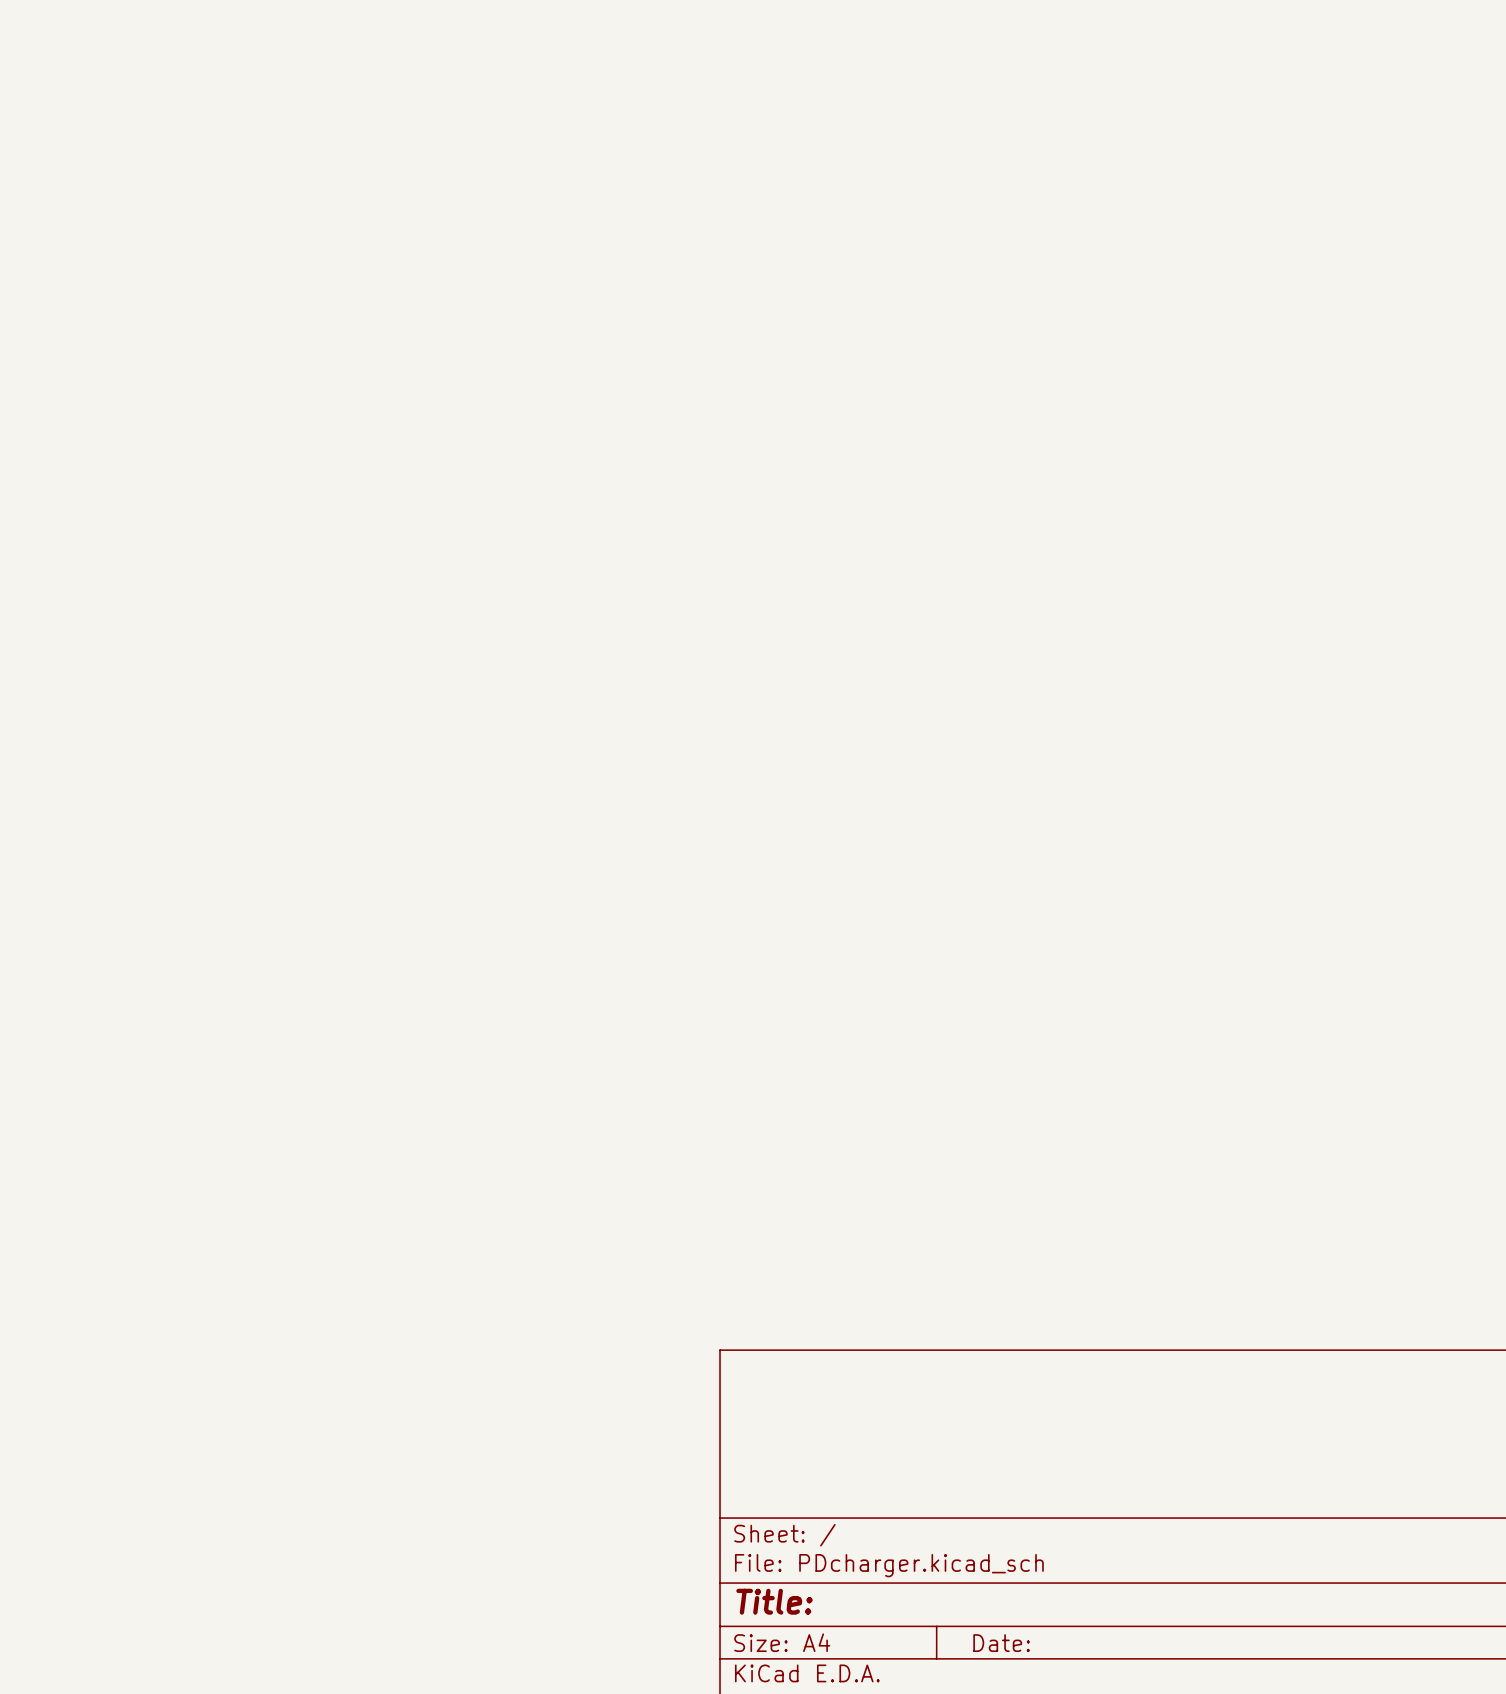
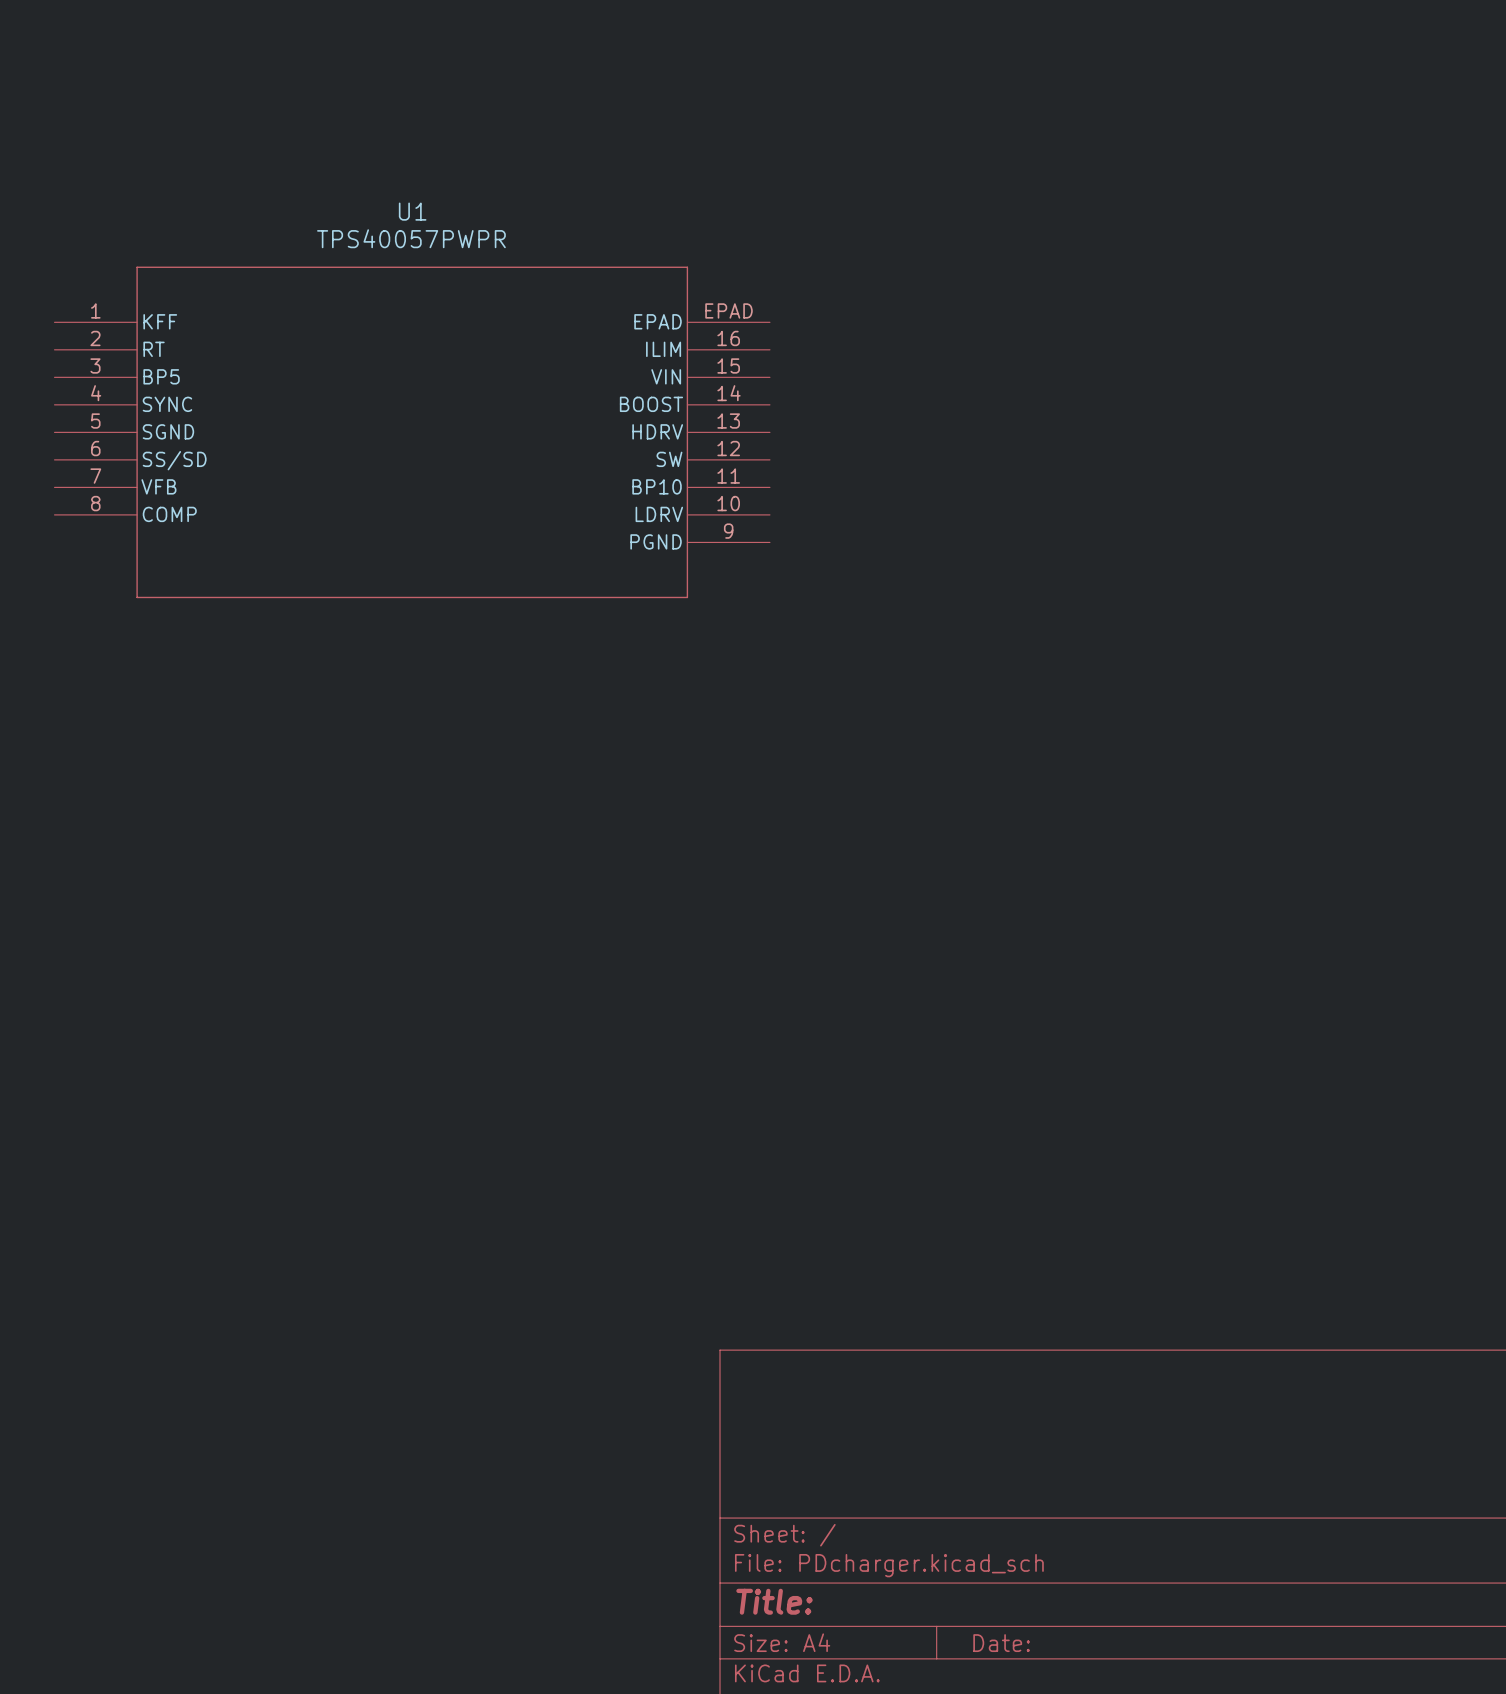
U1: none -> TPS40057PWPR (412, 432)

